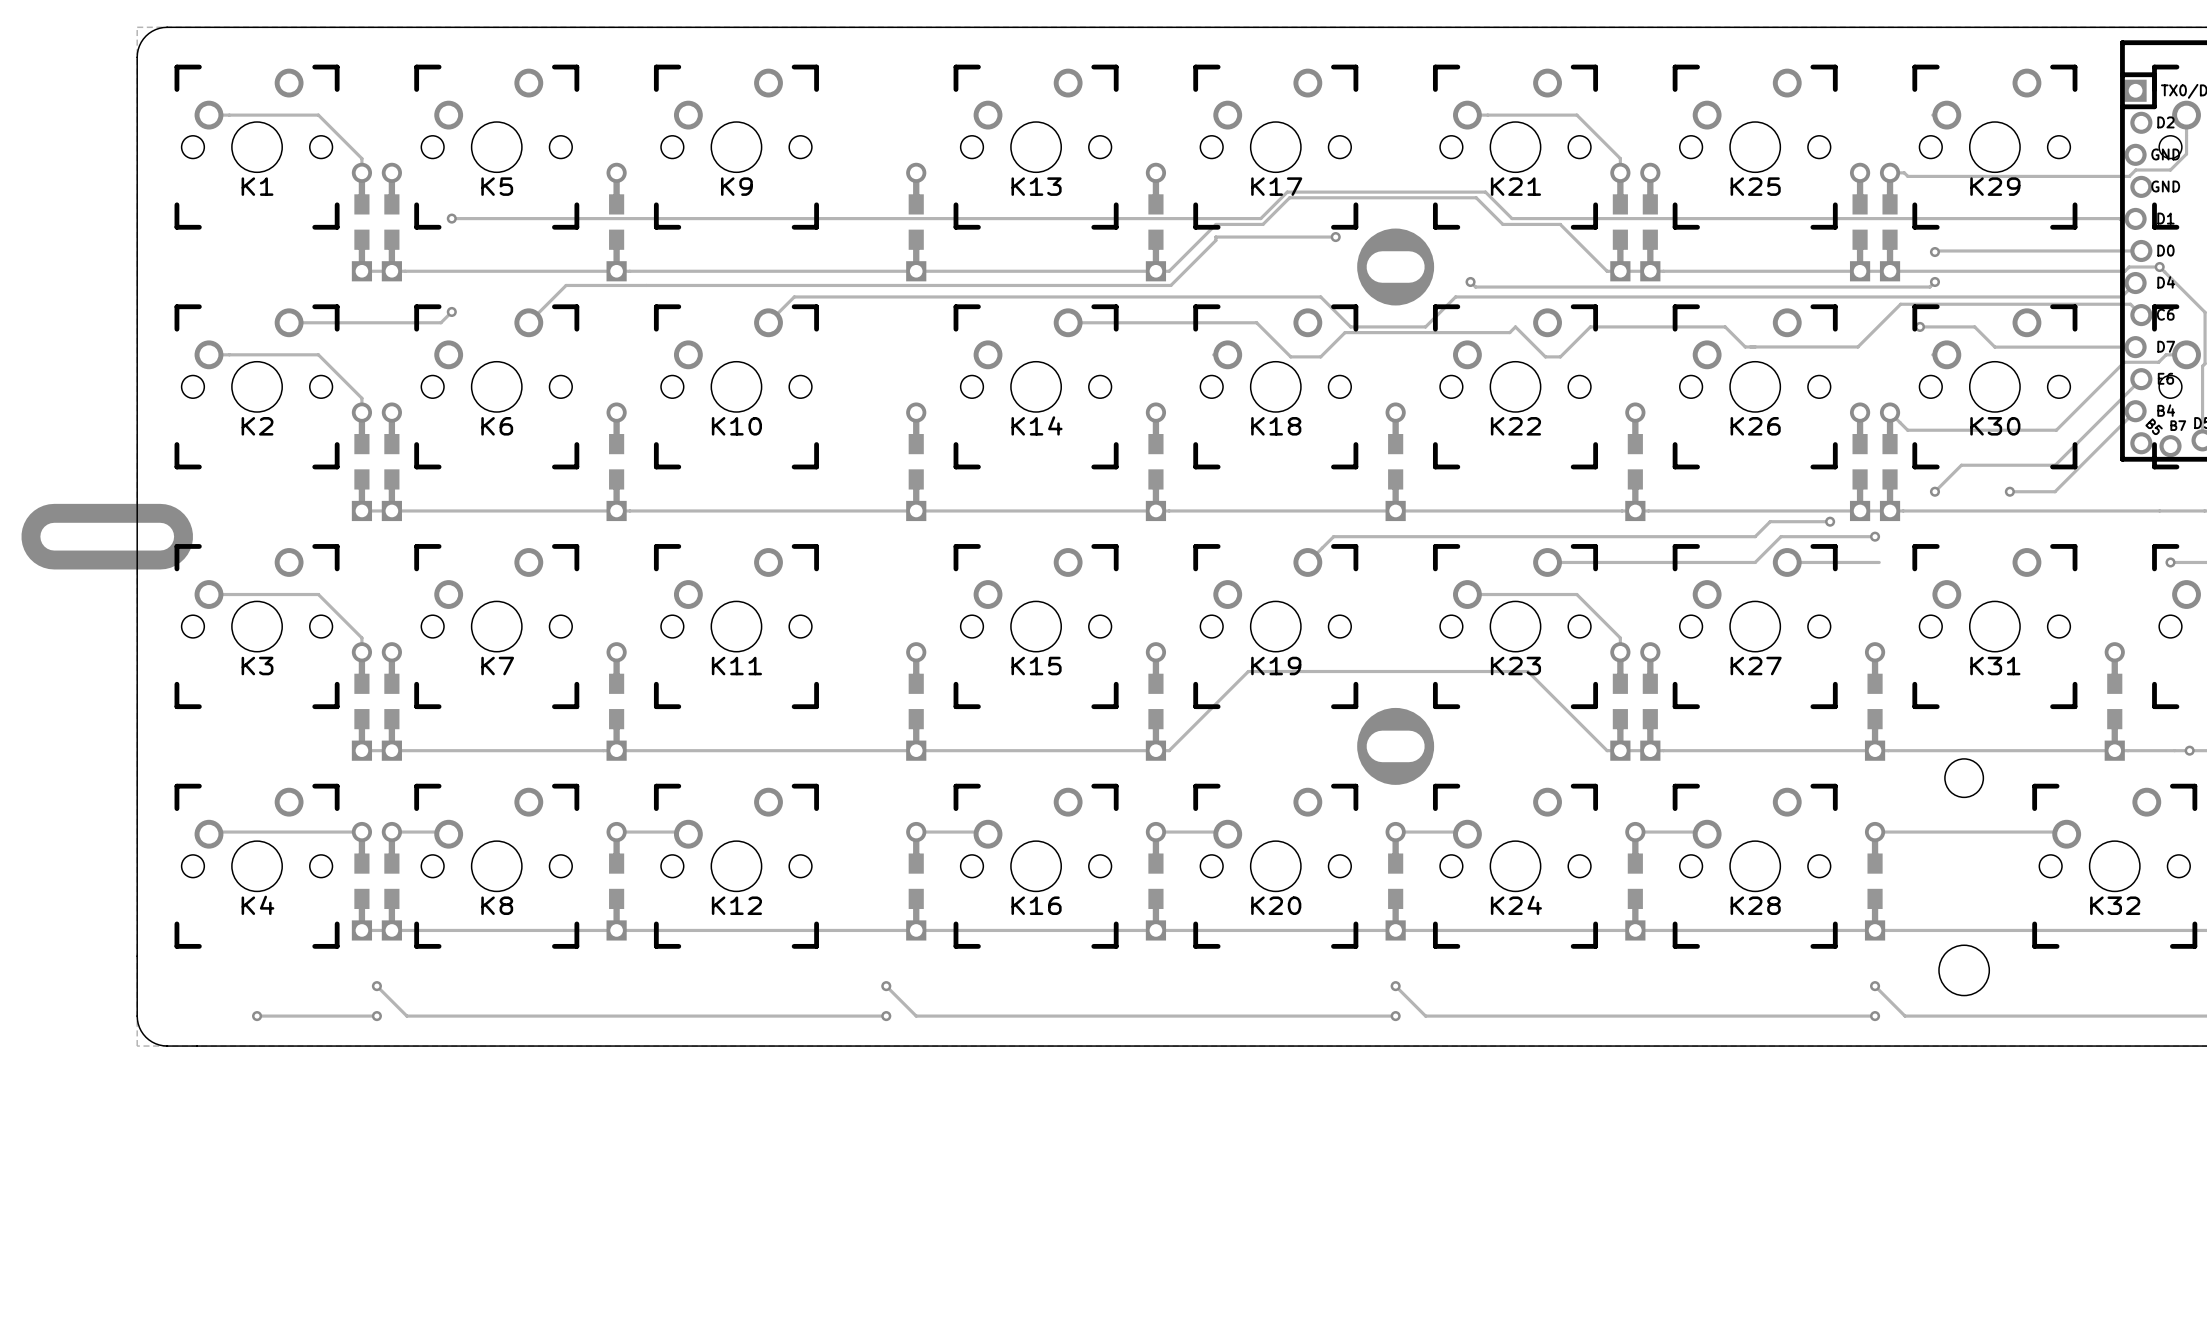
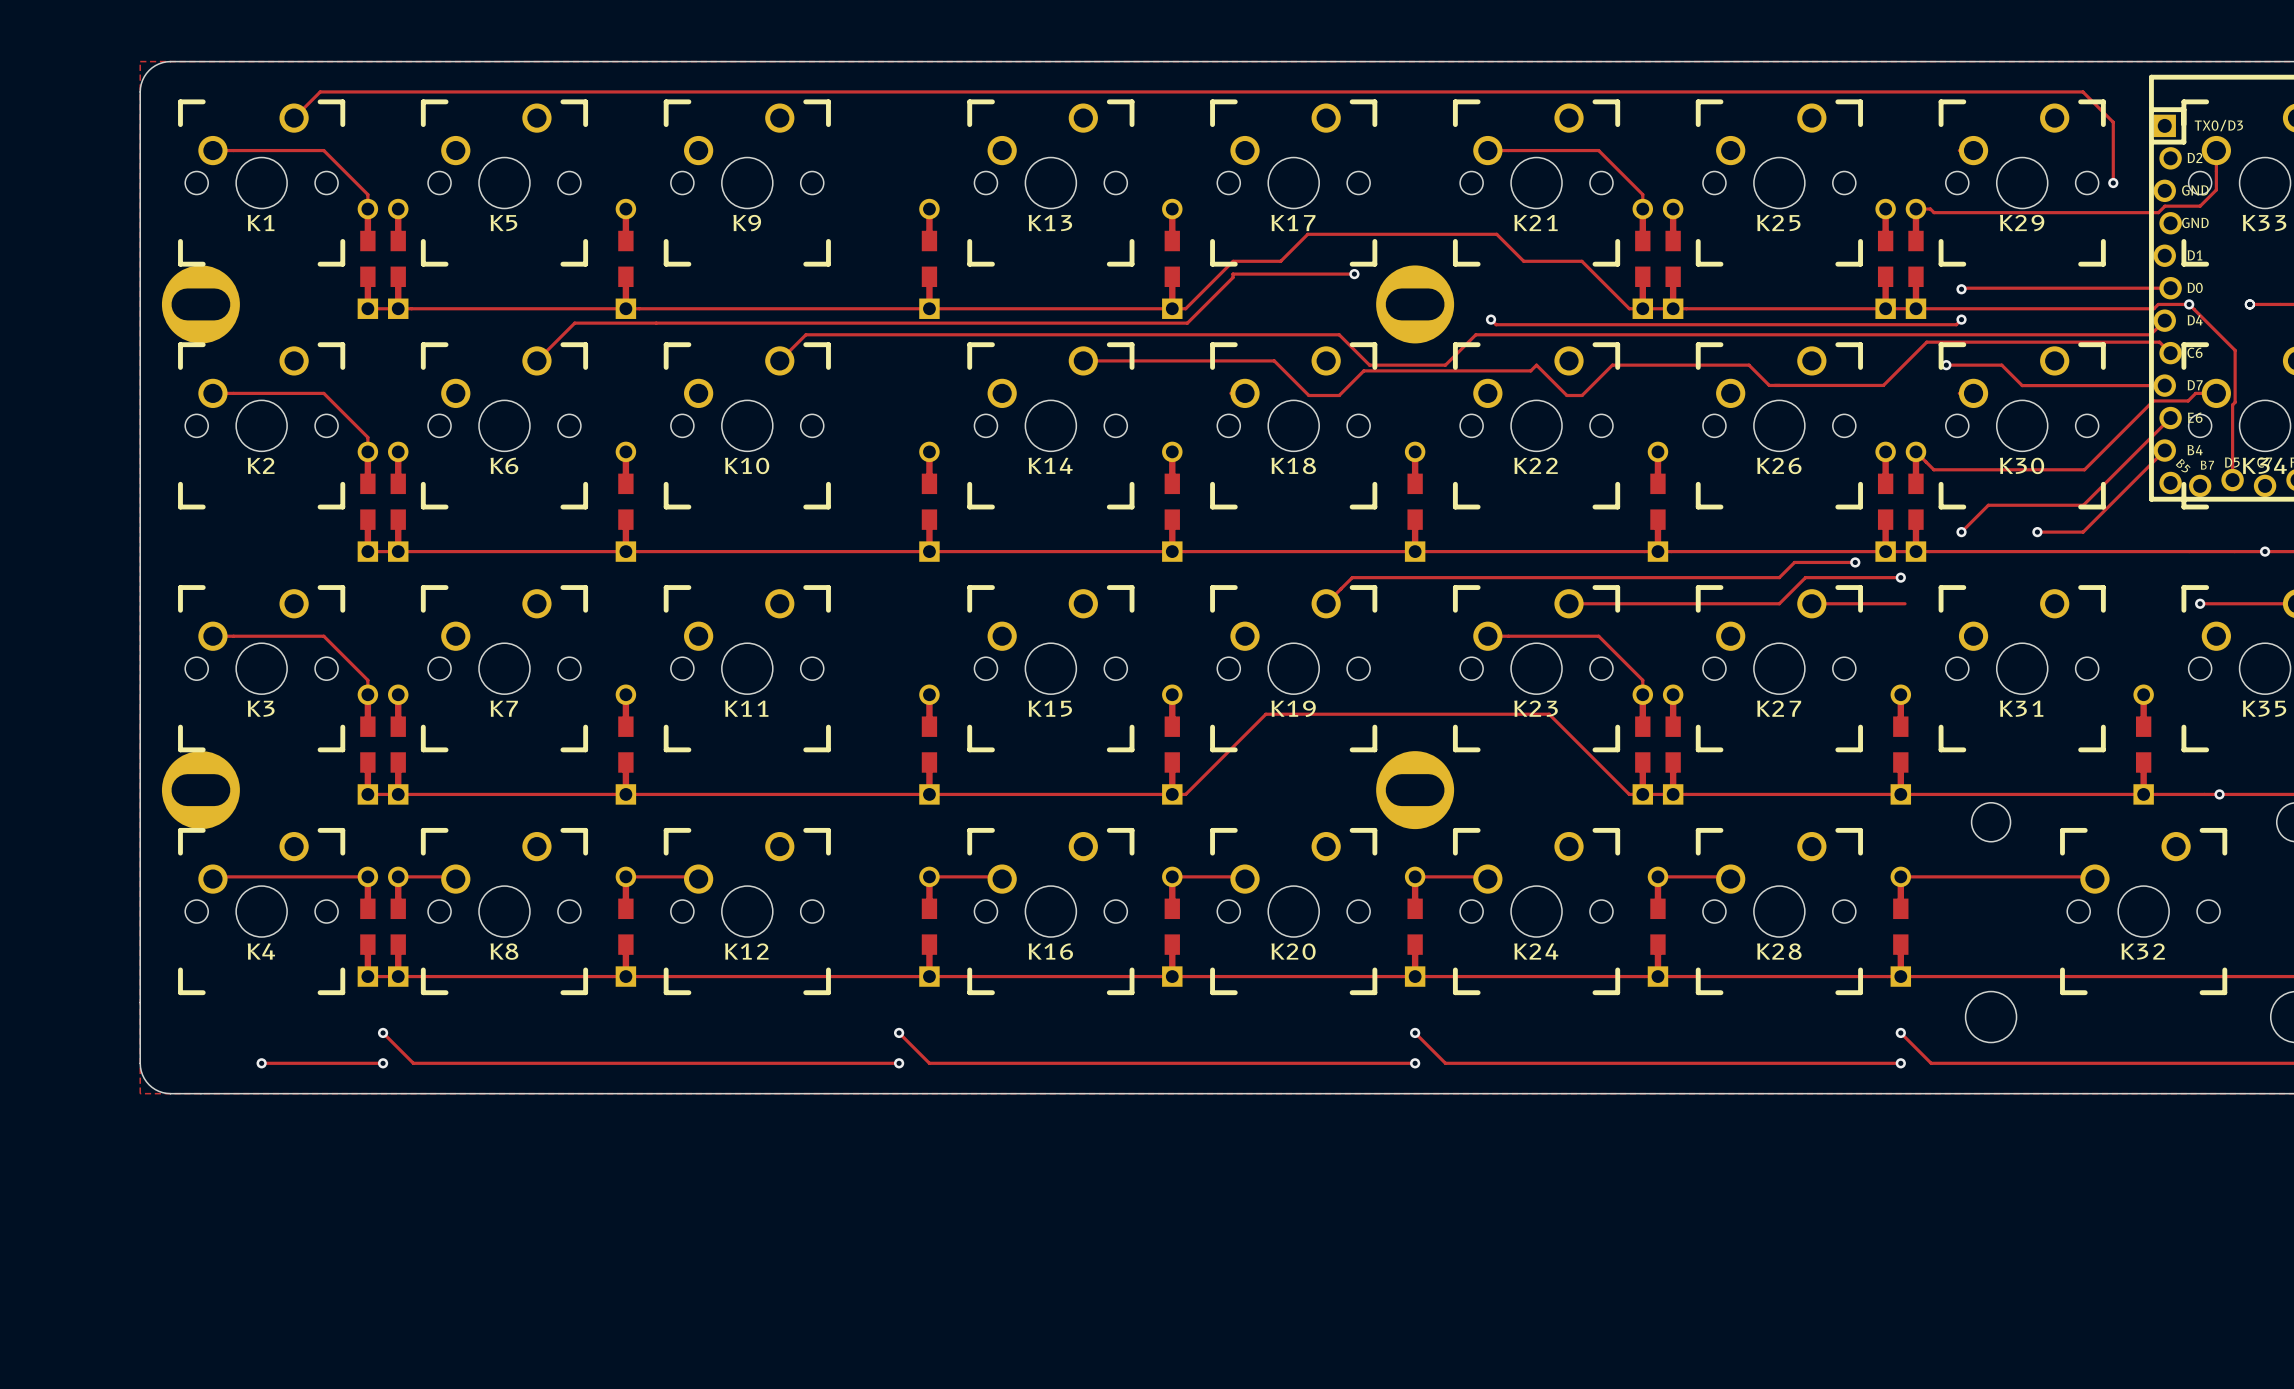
track: none -> (294, 118) (320, 91) (2082, 91) (2113, 122) (2113, 183)
via: none -> (2113, 183)
track: (451, 218) (1260, 218) (1287, 192) (1485, 192) (1512, 218) (2135, 218) -> none
via: (451, 218) -> none
part: none -> (200, 304)
track: (451, 311) (440, 322) (289, 322) -> none
via: (451, 311) -> none
part: (107, 536) -> none
part: none -> (200, 790)

